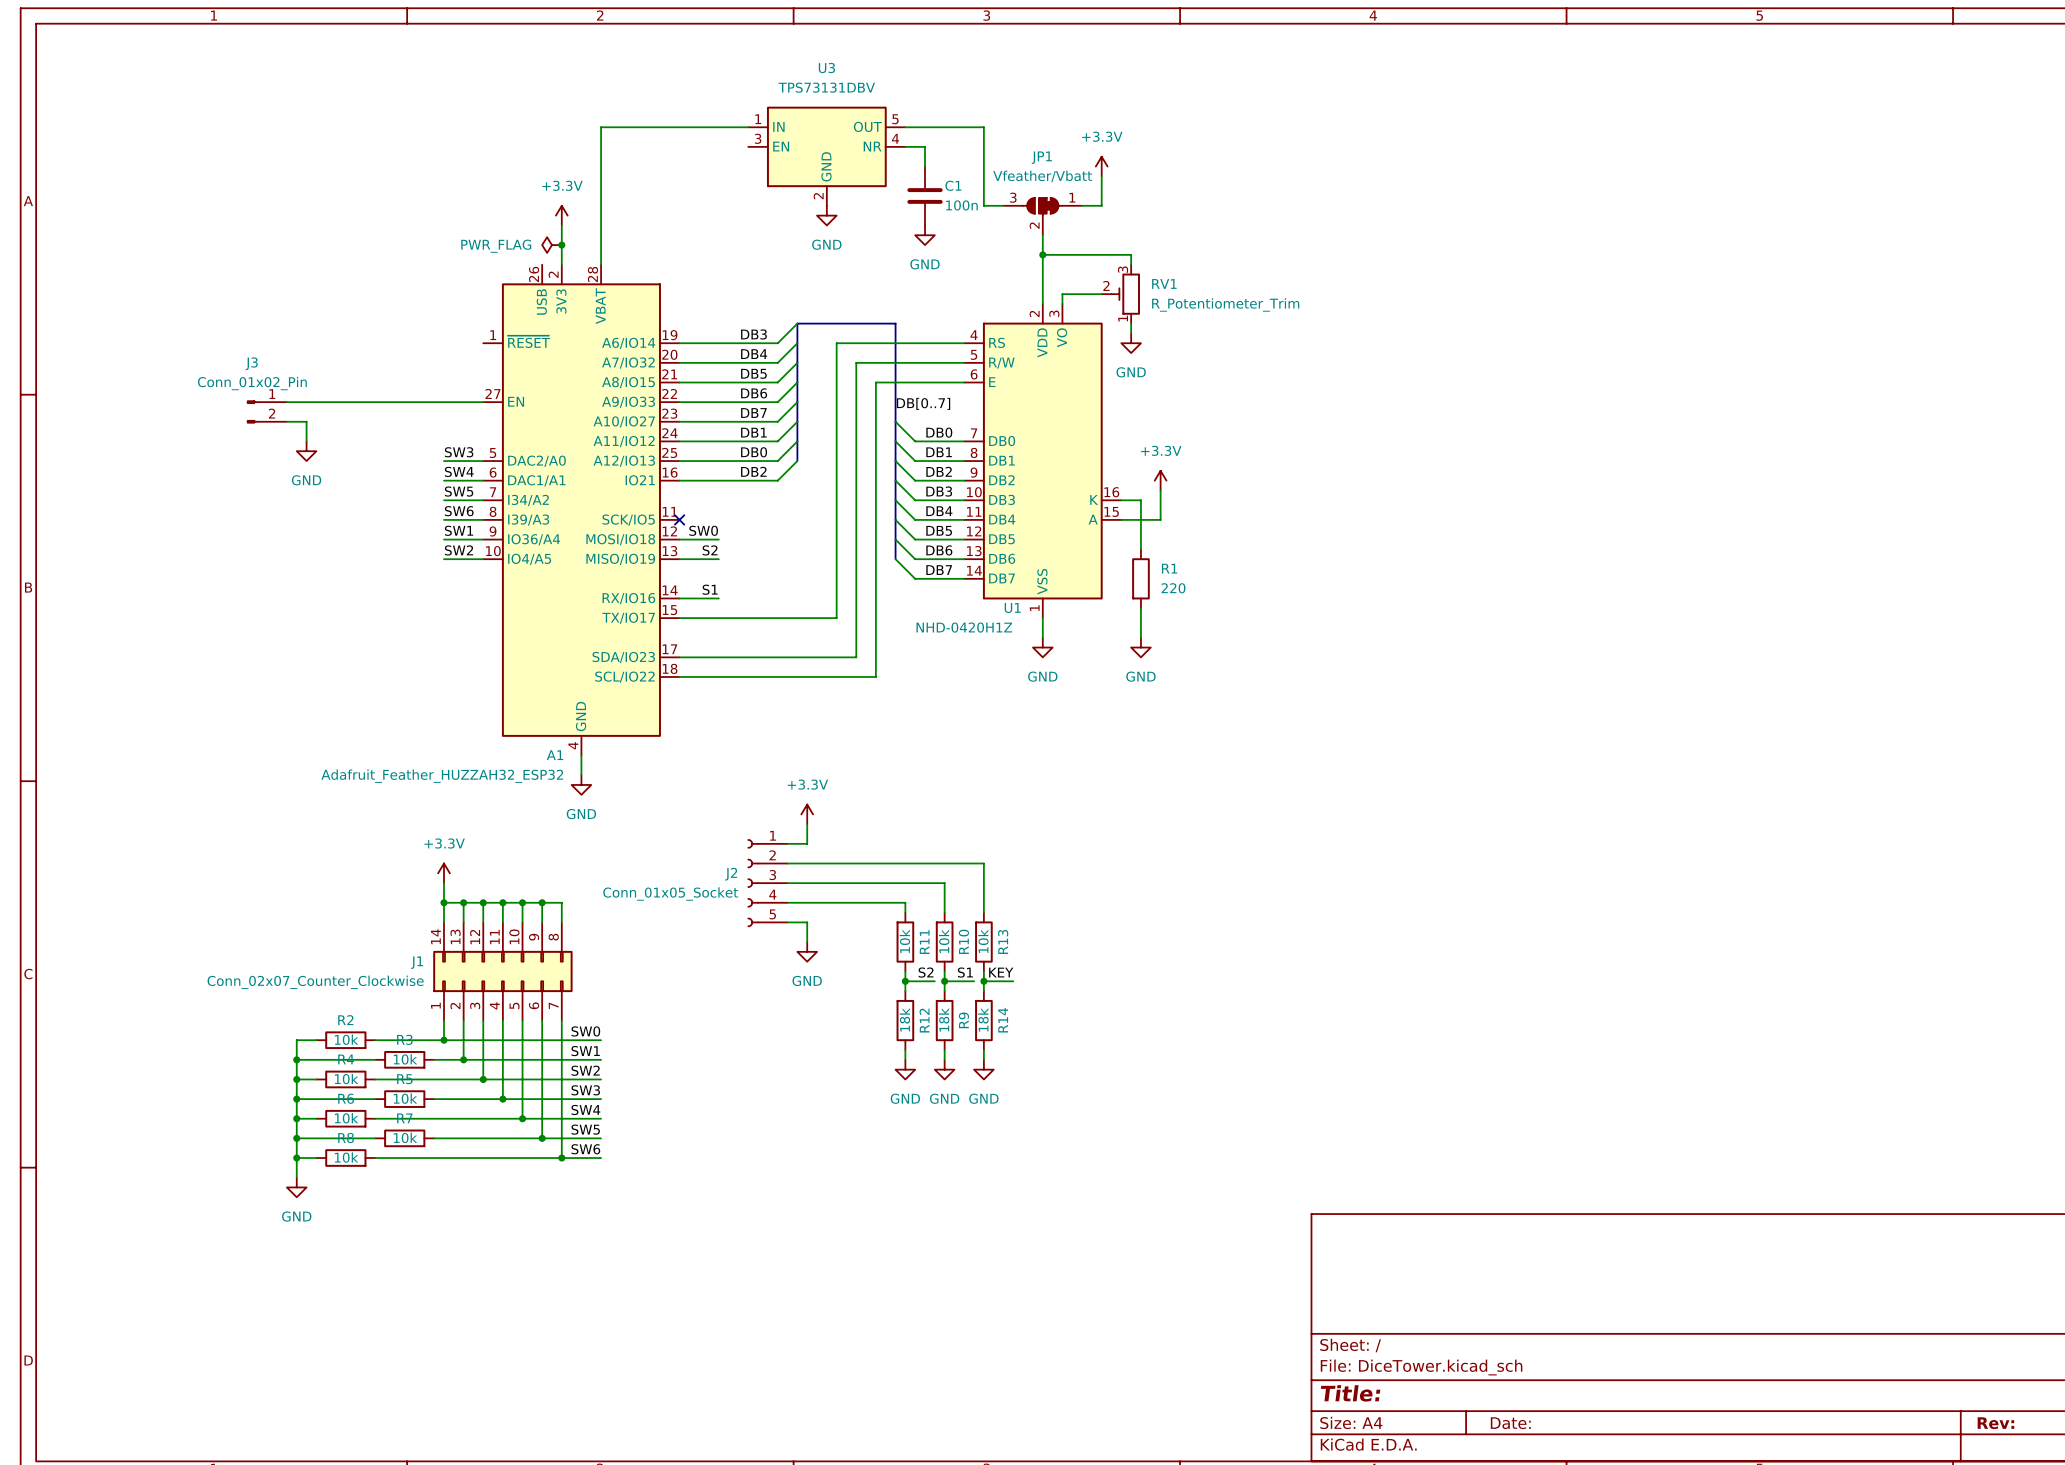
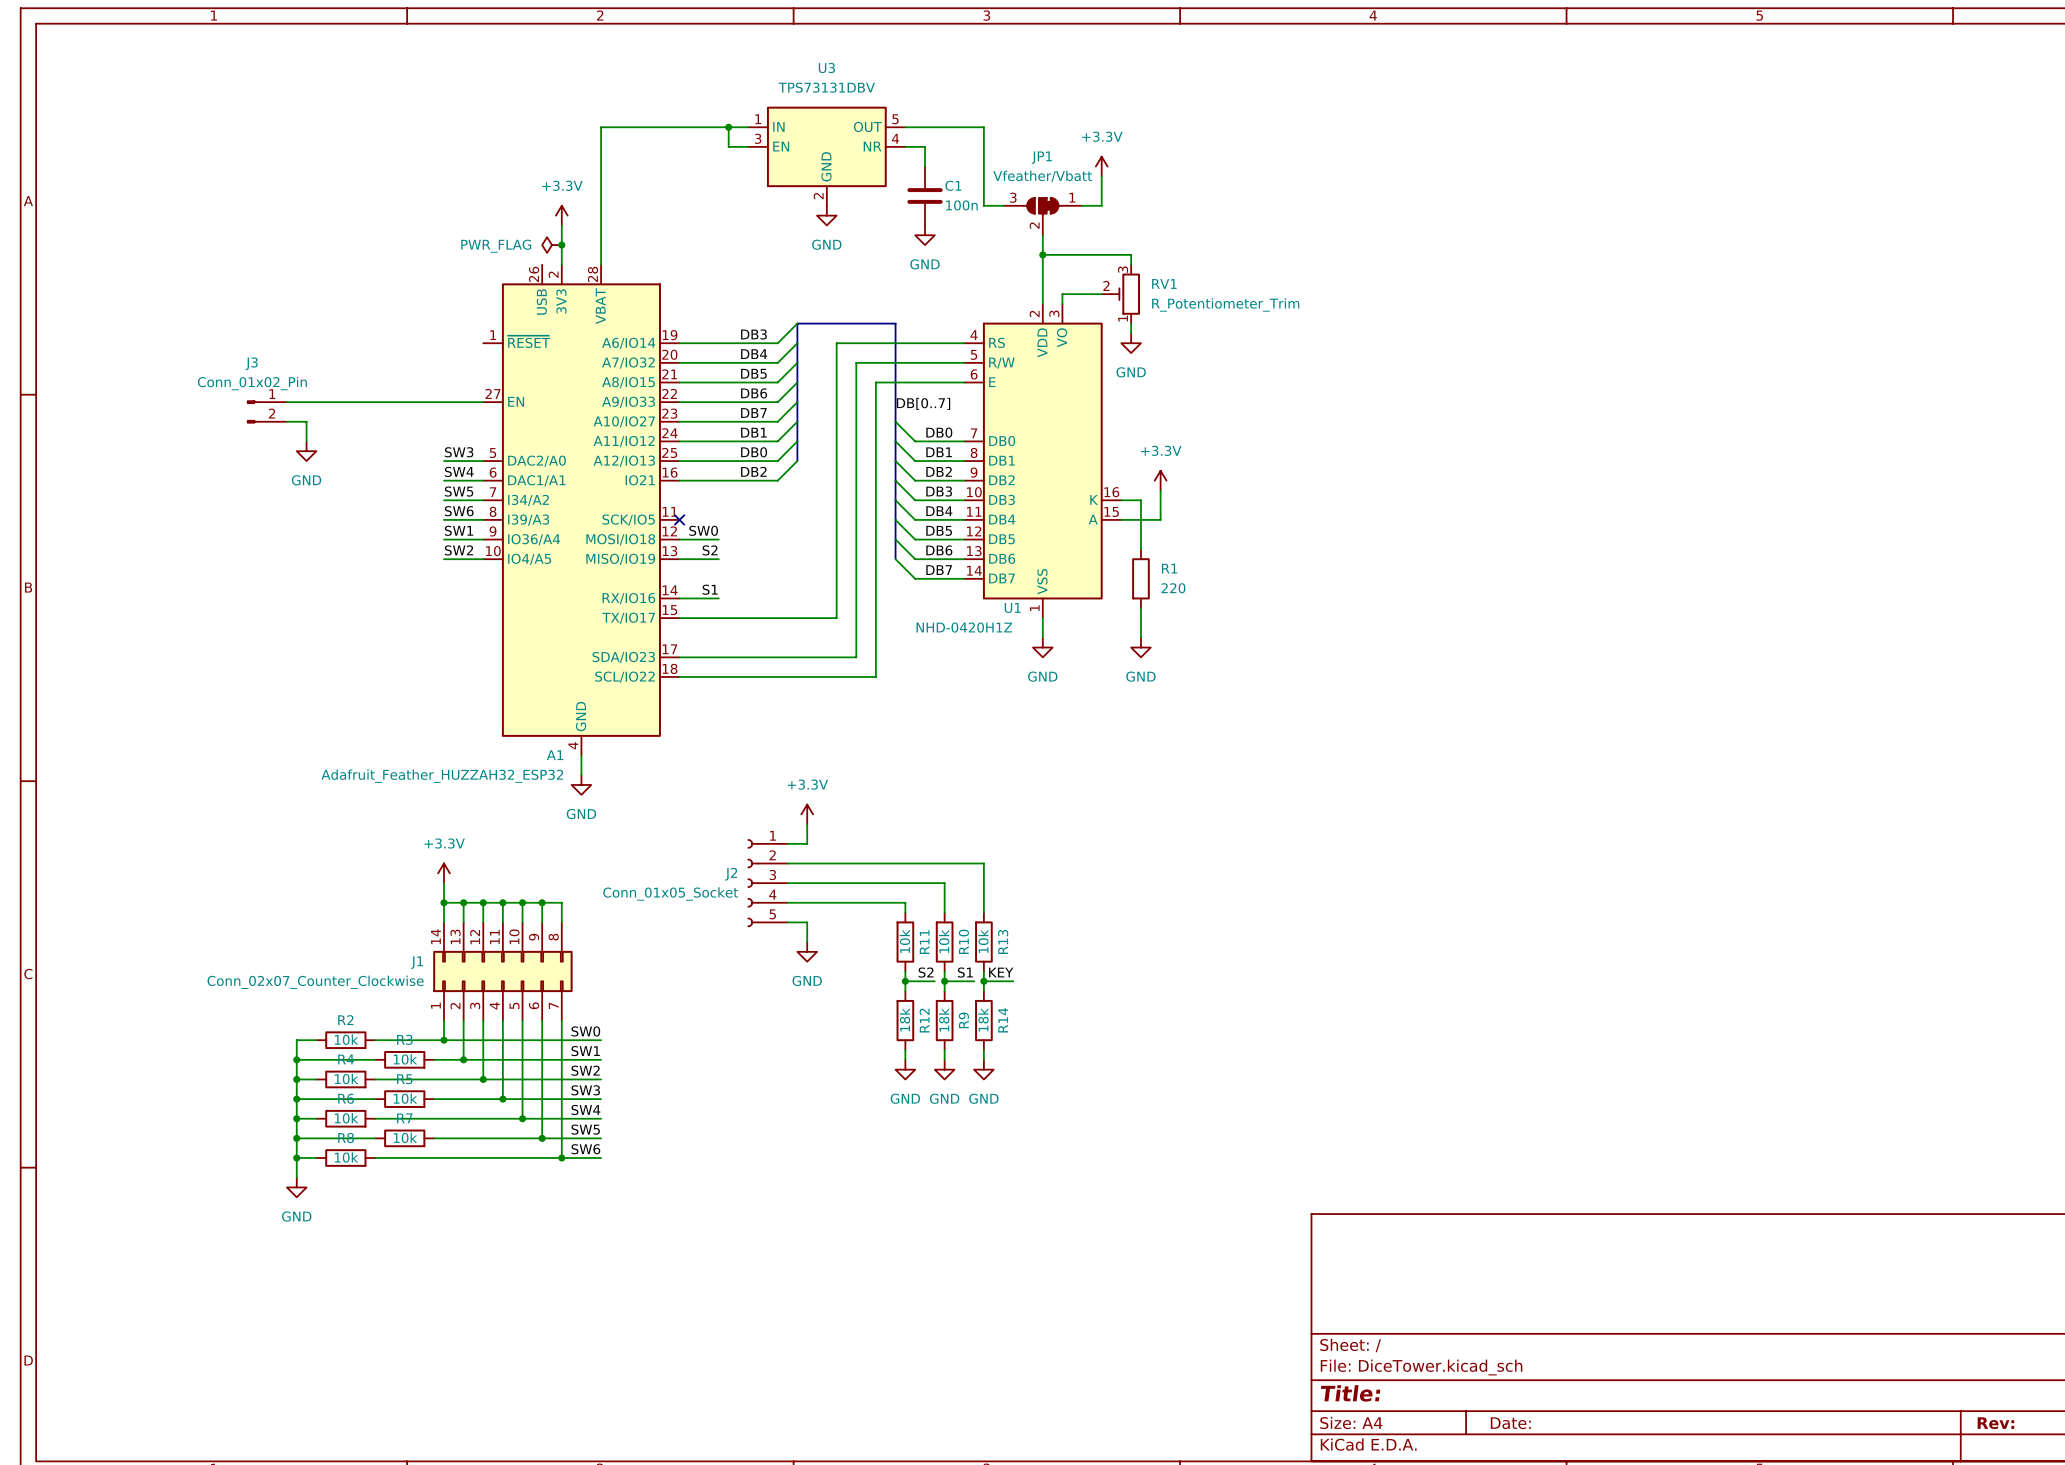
wire: none -> (728, 127) (728, 146) (748, 146)
junction: none -> (728, 127)

